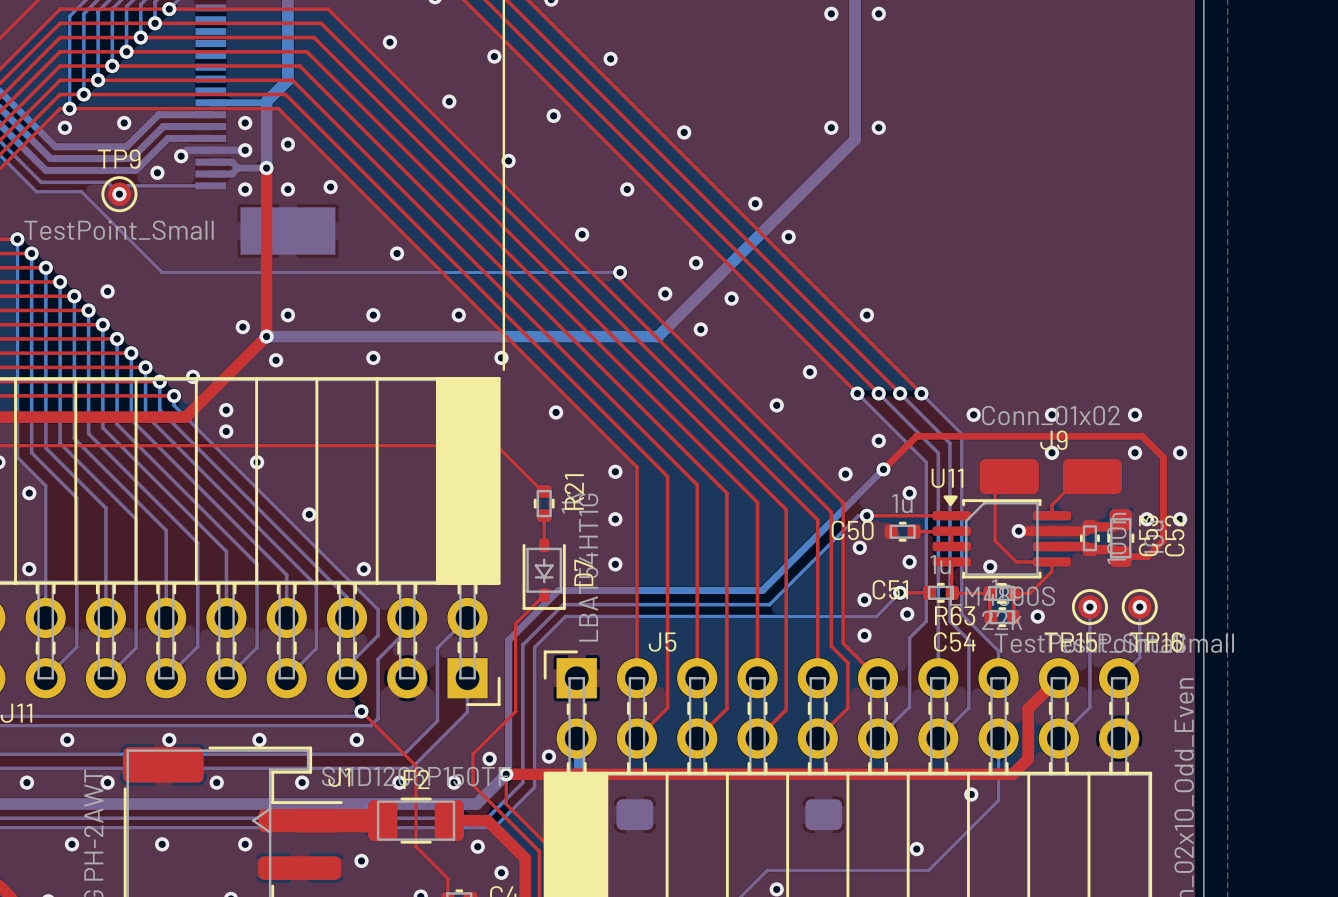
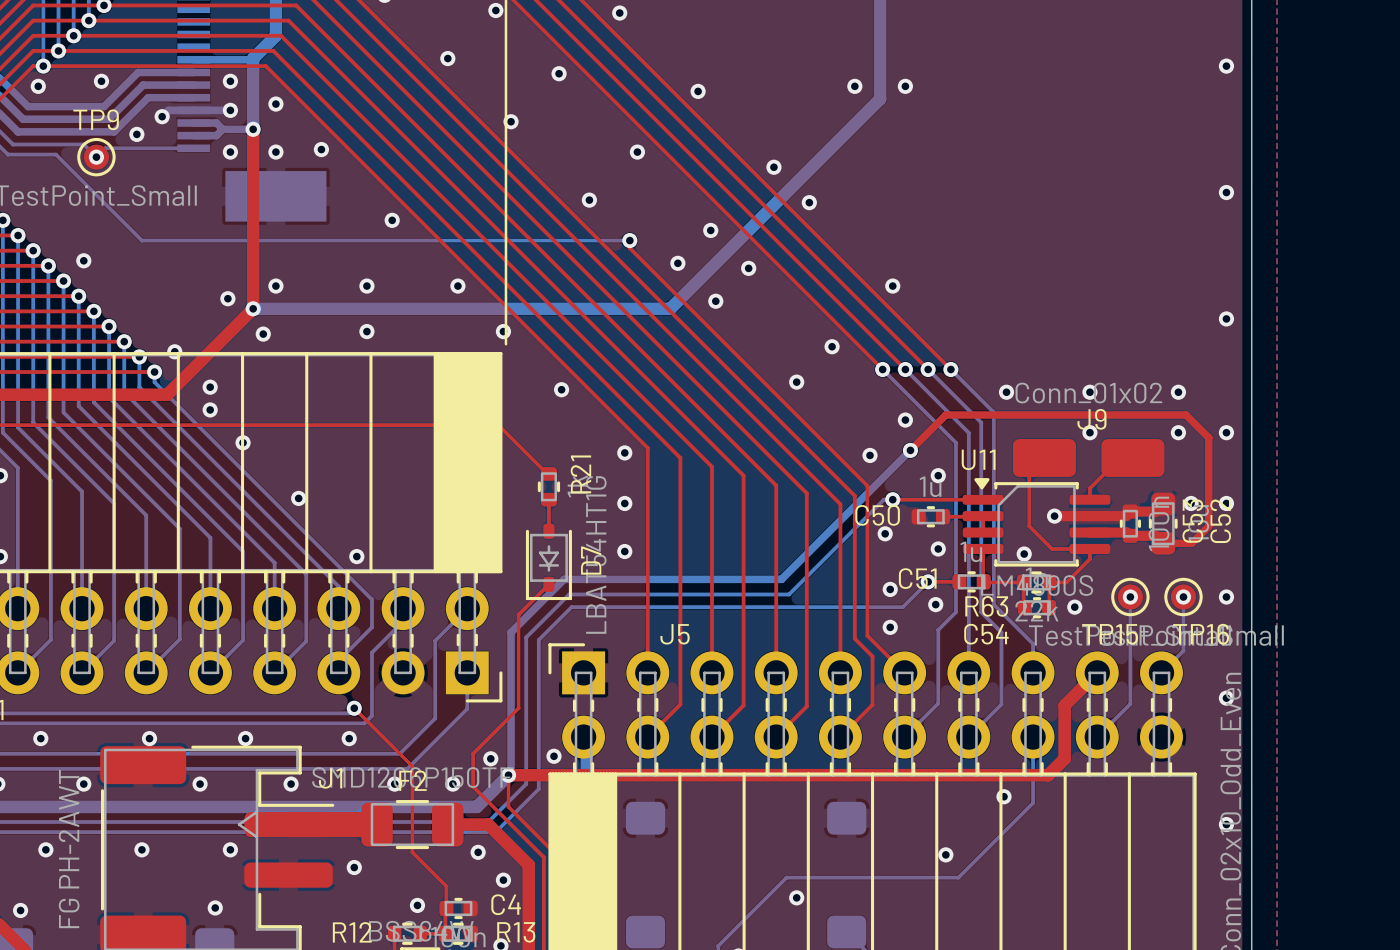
via: none -> (1226, 66)
via: none -> (1226, 192)
via: none -> (1226, 318)
via: none -> (1226, 597)
via: none -> (1226, 698)
via: none -> (1226, 824)

